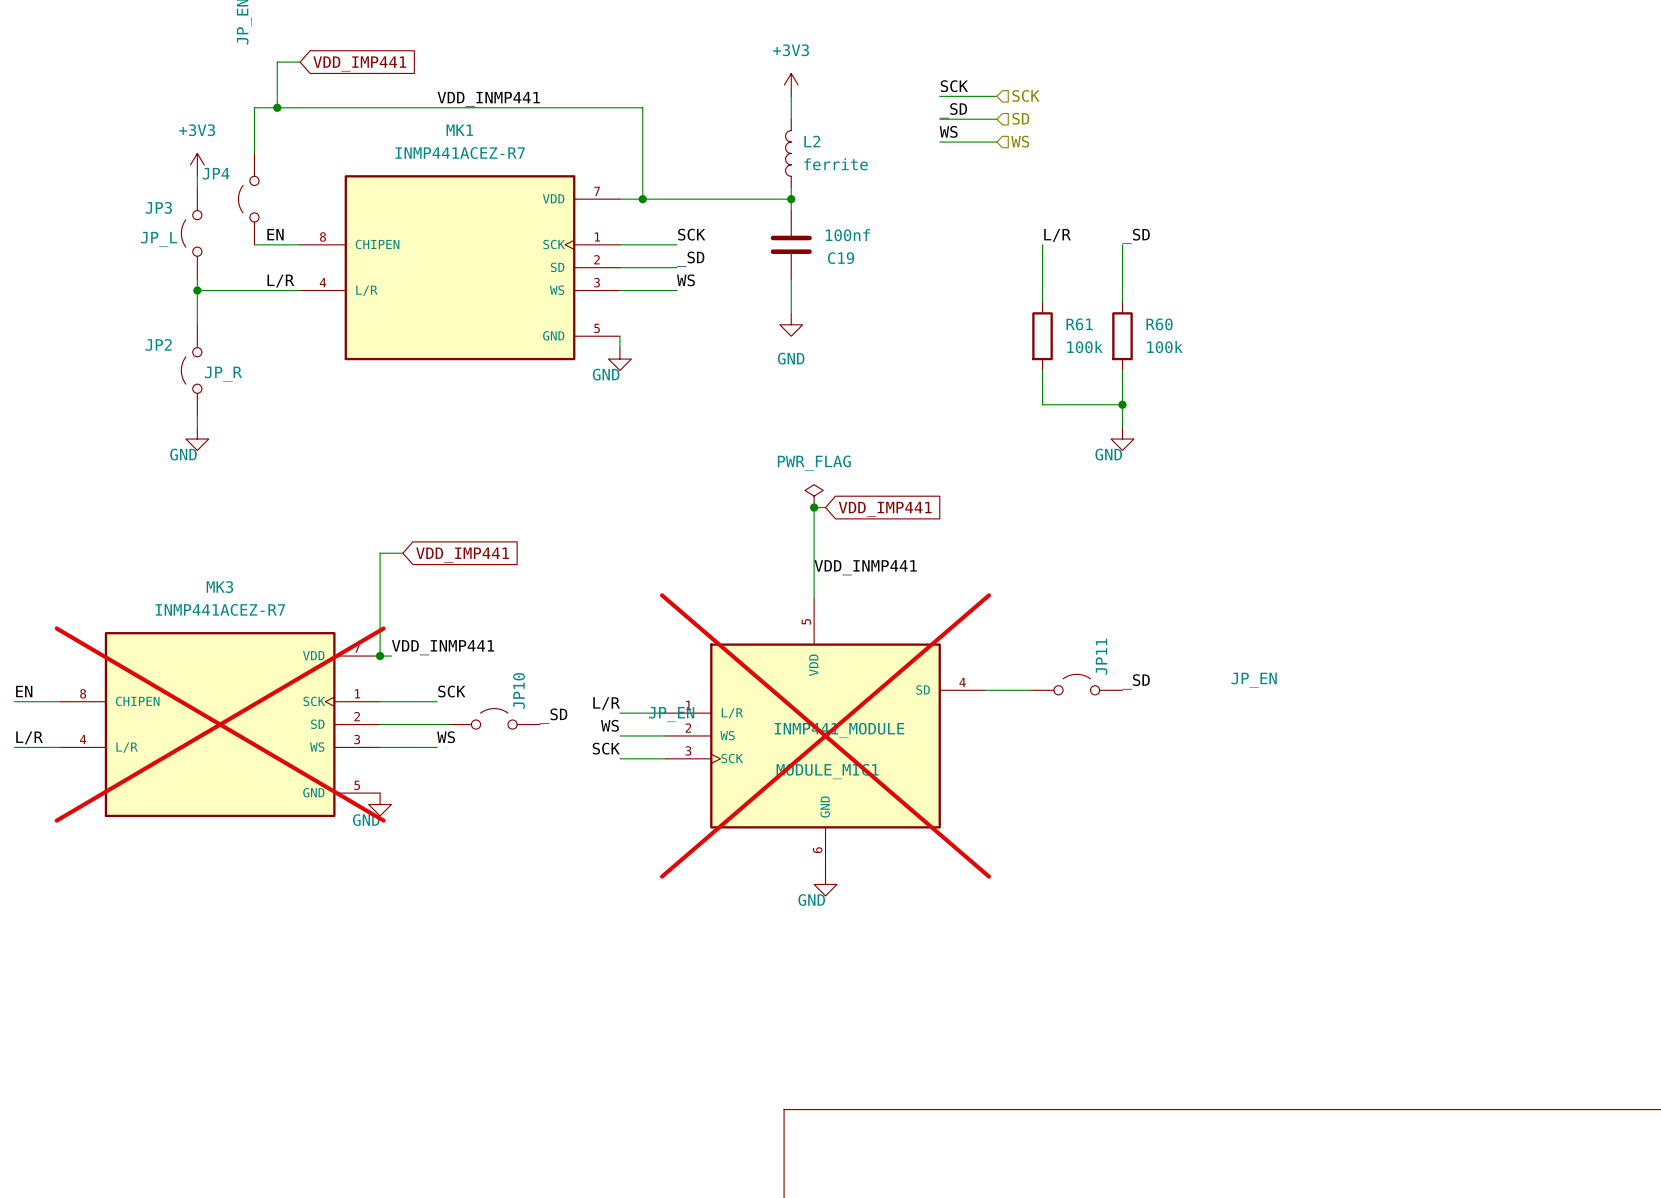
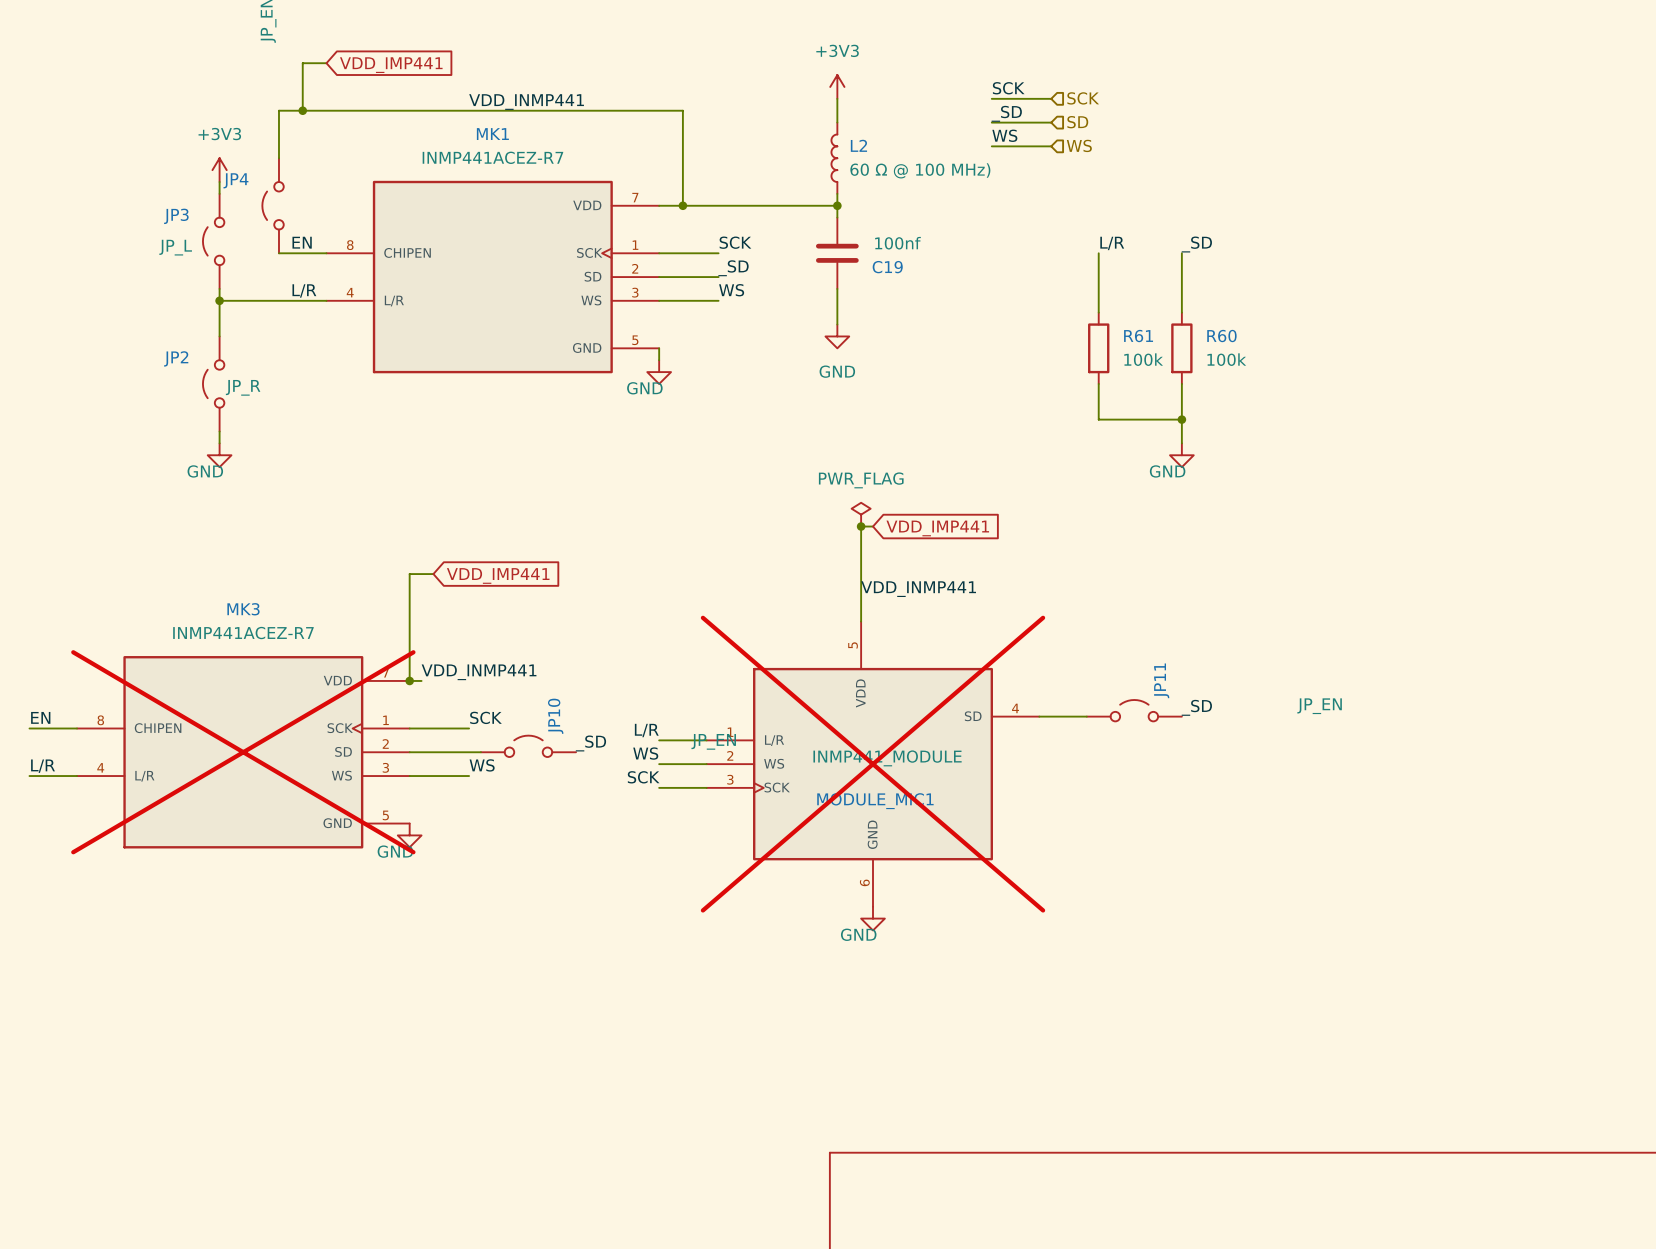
L2 value: ferrite (835, 164) -> 60 Ω @ 100 MHz) (920, 170)

